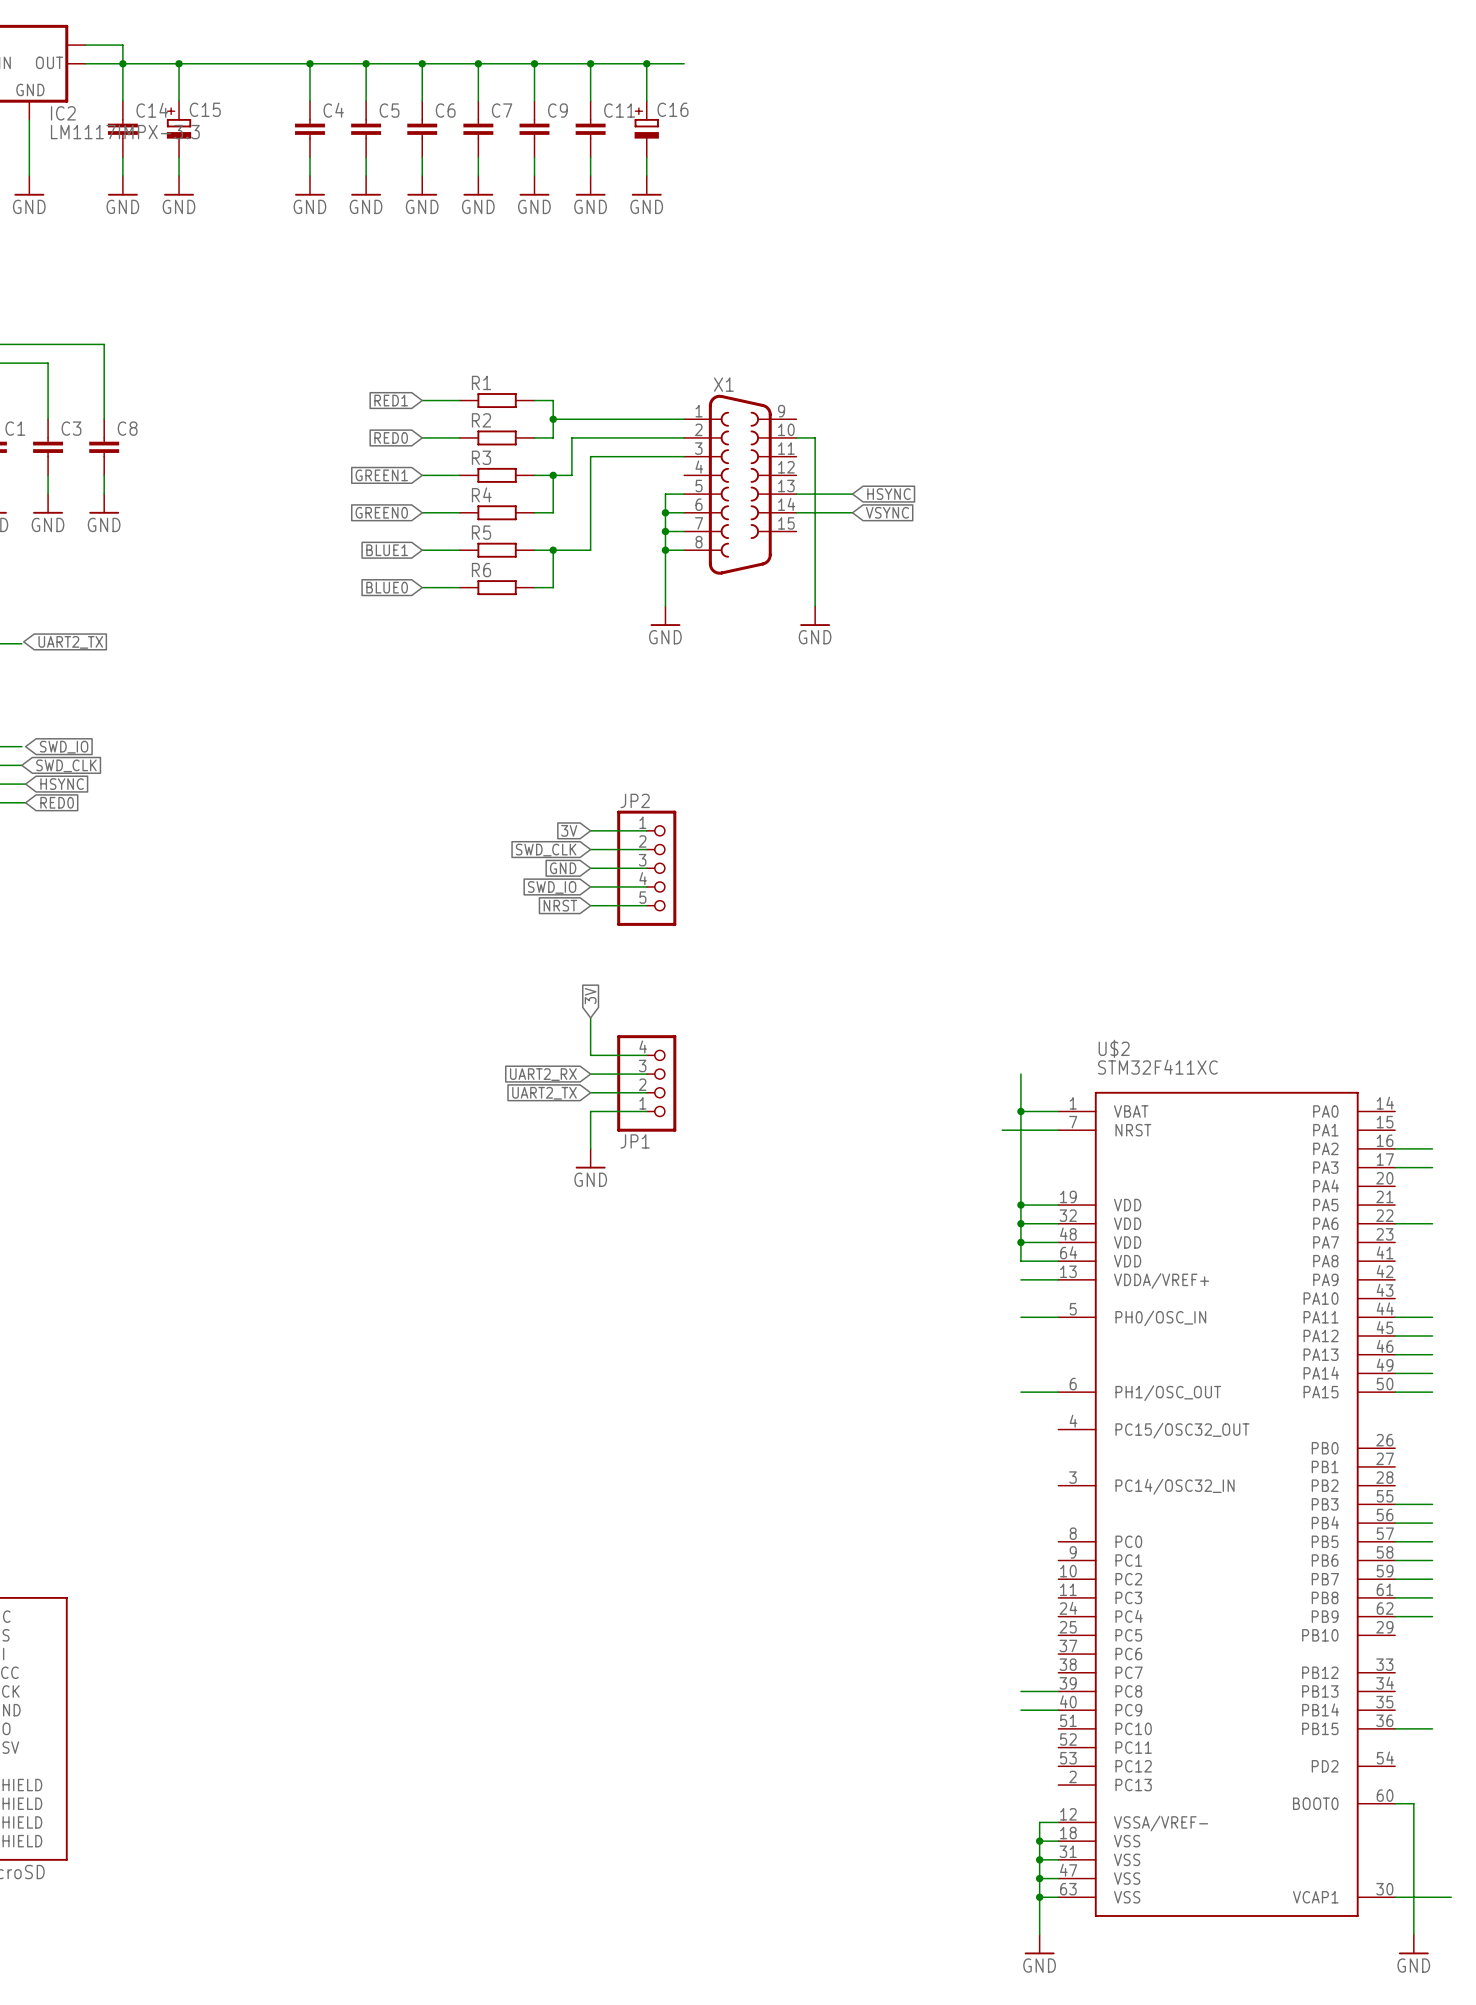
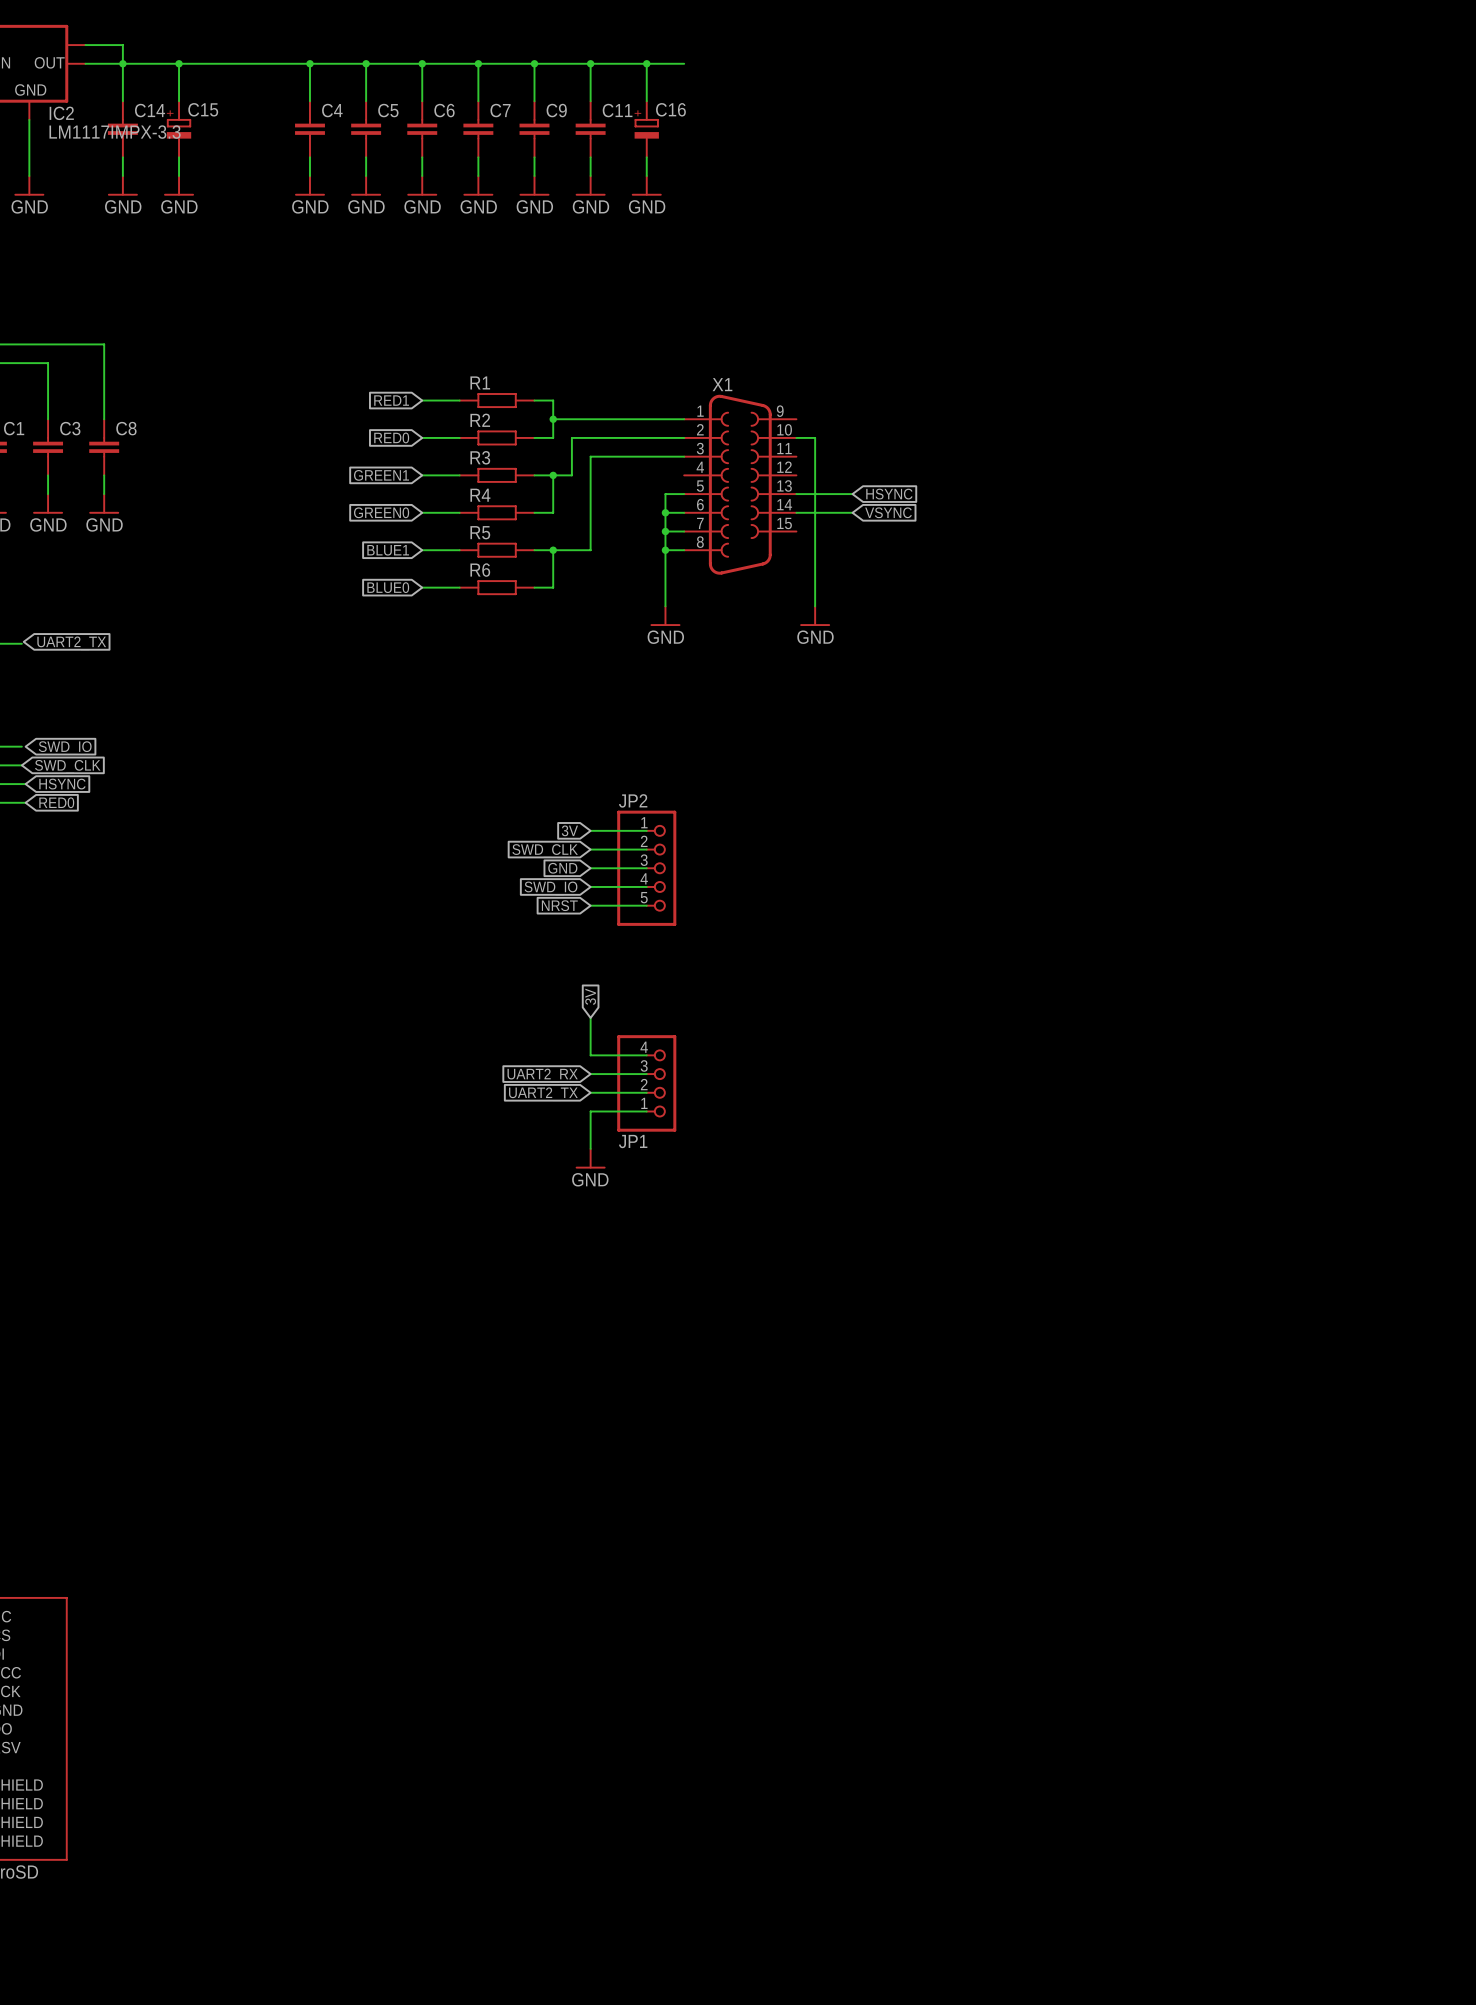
wire: (1020, 1074) (1020, 1261) (1058, 1261) -> none
wire: (1020, 1111) (1058, 1111) -> none
junction: (1020, 1111) -> none
wire: (1002, 1130) (1058, 1130) -> none
wire: (1395, 1148) (1432, 1148) -> none
wire: (1395, 1167) (1432, 1167) -> none
wire: (1020, 1205) (1058, 1205) -> none
junction: (1020, 1205) -> none
wire: (1020, 1223) (1058, 1223) -> none
junction: (1020, 1223) -> none
wire: (1395, 1223) (1432, 1223) -> none
wire: (1020, 1242) (1058, 1242) -> none
junction: (1020, 1242) -> none
wire: (1020, 1279) (1058, 1279) -> none
wire: (1020, 1317) (1058, 1317) -> none
wire: (1395, 1317) (1432, 1317) -> none
wire: (1395, 1336) (1432, 1336) -> none
wire: (1395, 1354) (1432, 1354) -> none
wire: (1395, 1373) (1432, 1373) -> none
wire: (1020, 1392) (1058, 1392) -> none
wire: (1395, 1392) (1432, 1392) -> none
U$2: STM32F411XC (1226, 1504) -> none
wire: (1395, 1504) (1432, 1504) -> none
wire: (1395, 1523) (1432, 1523) -> none
wire: (1395, 1541) (1432, 1541) -> none
wire: (1395, 1560) (1432, 1560) -> none
wire: (1395, 1579) (1432, 1579) -> none
wire: (1395, 1597) (1432, 1597) -> none
wire: (1395, 1616) (1432, 1616) -> none
wire: (1020, 1691) (1058, 1691) -> none
wire: (1020, 1710) (1058, 1710) -> none
wire: (1395, 1728) (1432, 1728) -> none
wire: (1395, 1803) (1413, 1803) (1413, 1934) -> none
wire: (1058, 1822) (1039, 1822) (1039, 1934) -> none
wire: (1039, 1841) (1058, 1841) -> none
junction: (1039, 1841) -> none
wire: (1039, 1859) (1058, 1859) -> none
junction: (1039, 1859) -> none
wire: (1039, 1878) (1058, 1878) -> none
junction: (1039, 1878) -> none
wire: (1039, 1897) (1058, 1897) -> none
junction: (1039, 1897) -> none
wire: (1395, 1897) (1451, 1897) -> none
power symbol: GND (1039, 1944) -> none
power symbol: GND (1413, 1944) -> none

